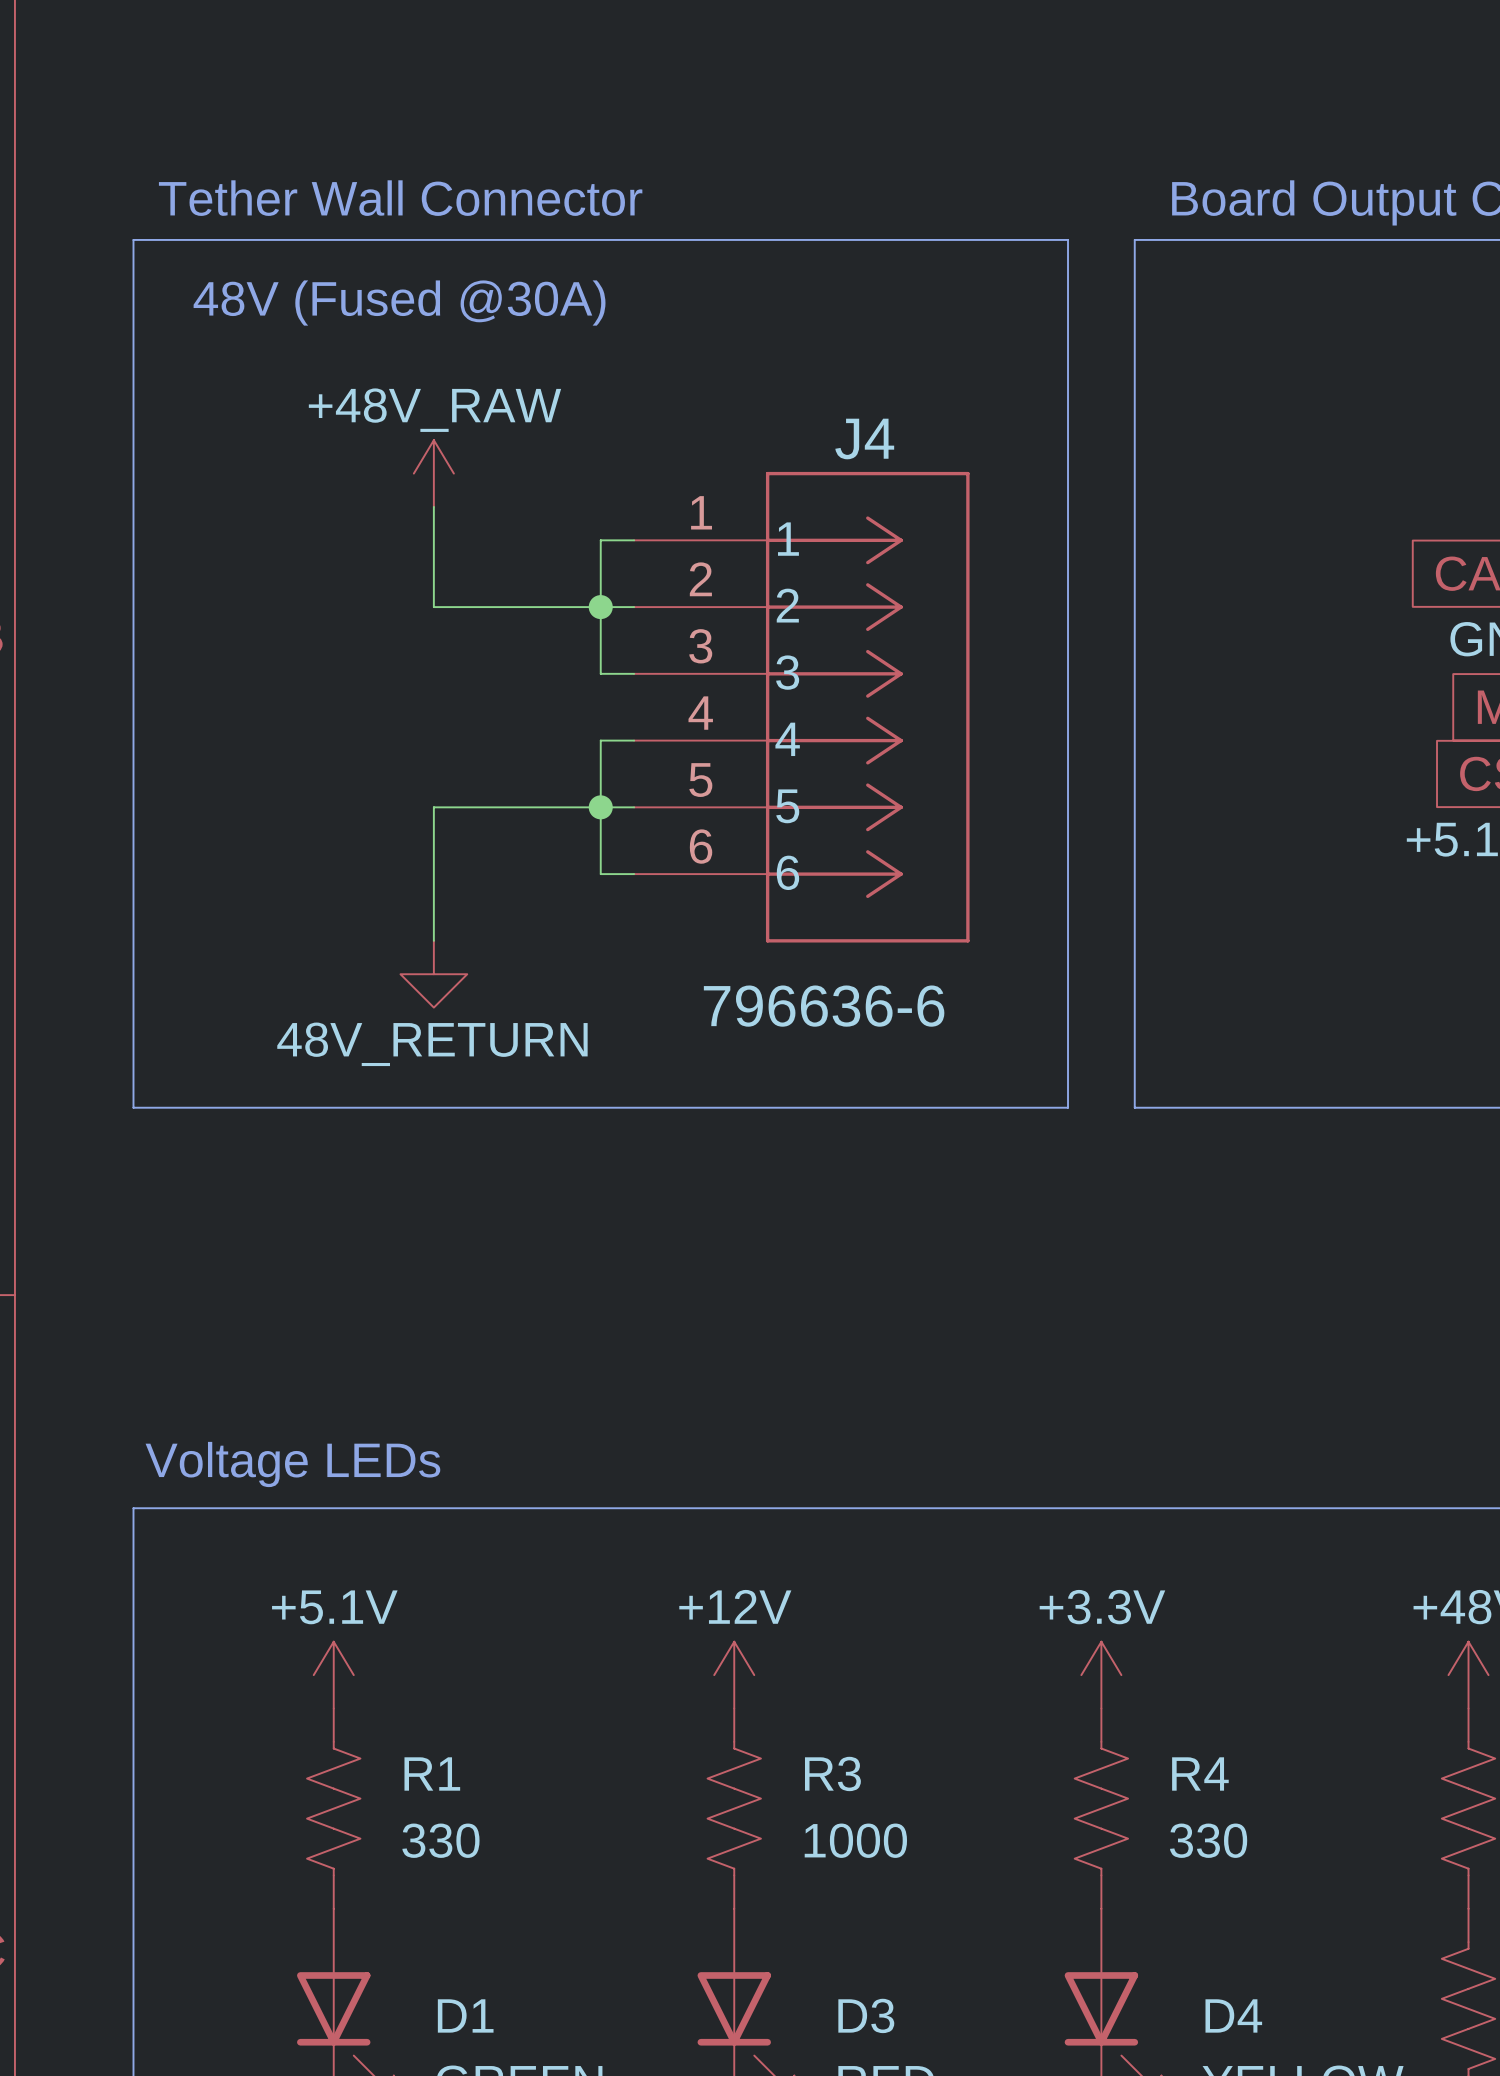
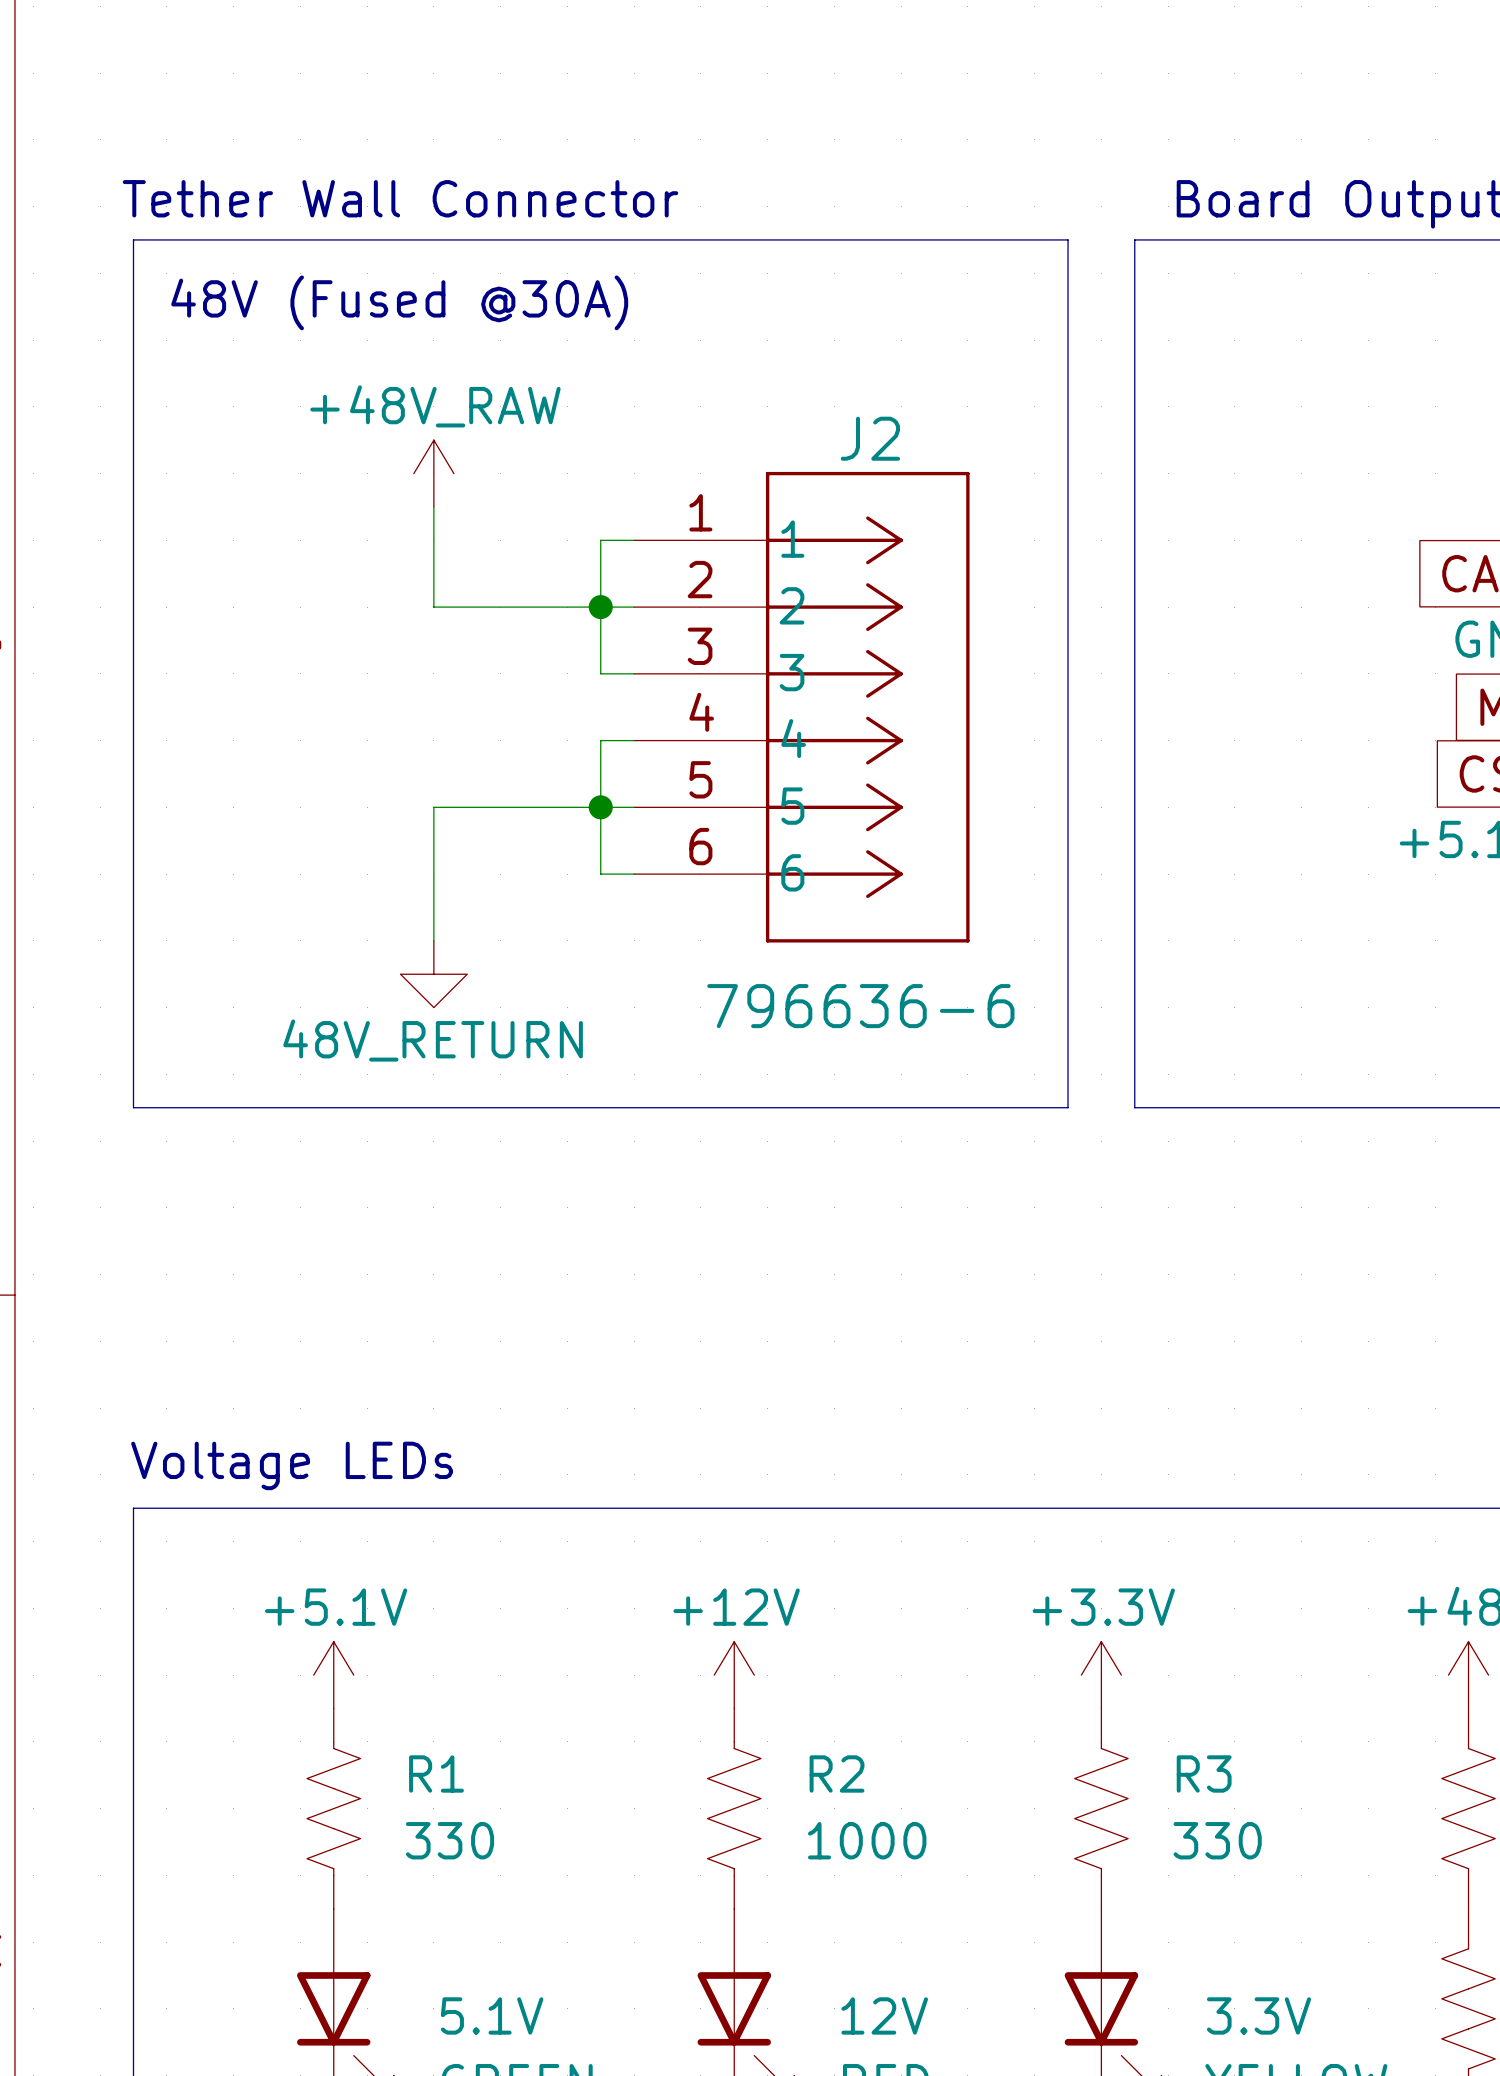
J4 name: J4 (864, 439) -> J2 (870, 438)
R3 name: R3 (832, 1773) -> R2 (837, 1773)
R4 name: R4 (1200, 1773) -> R3 (1204, 1773)
D1 name: D1 (465, 2015) -> 5.1V (492, 2015)
D3 name: D3 (866, 2015) -> 12V (884, 2015)
D4 name: D4 (1233, 2015) -> 3.3V (1258, 2015)

